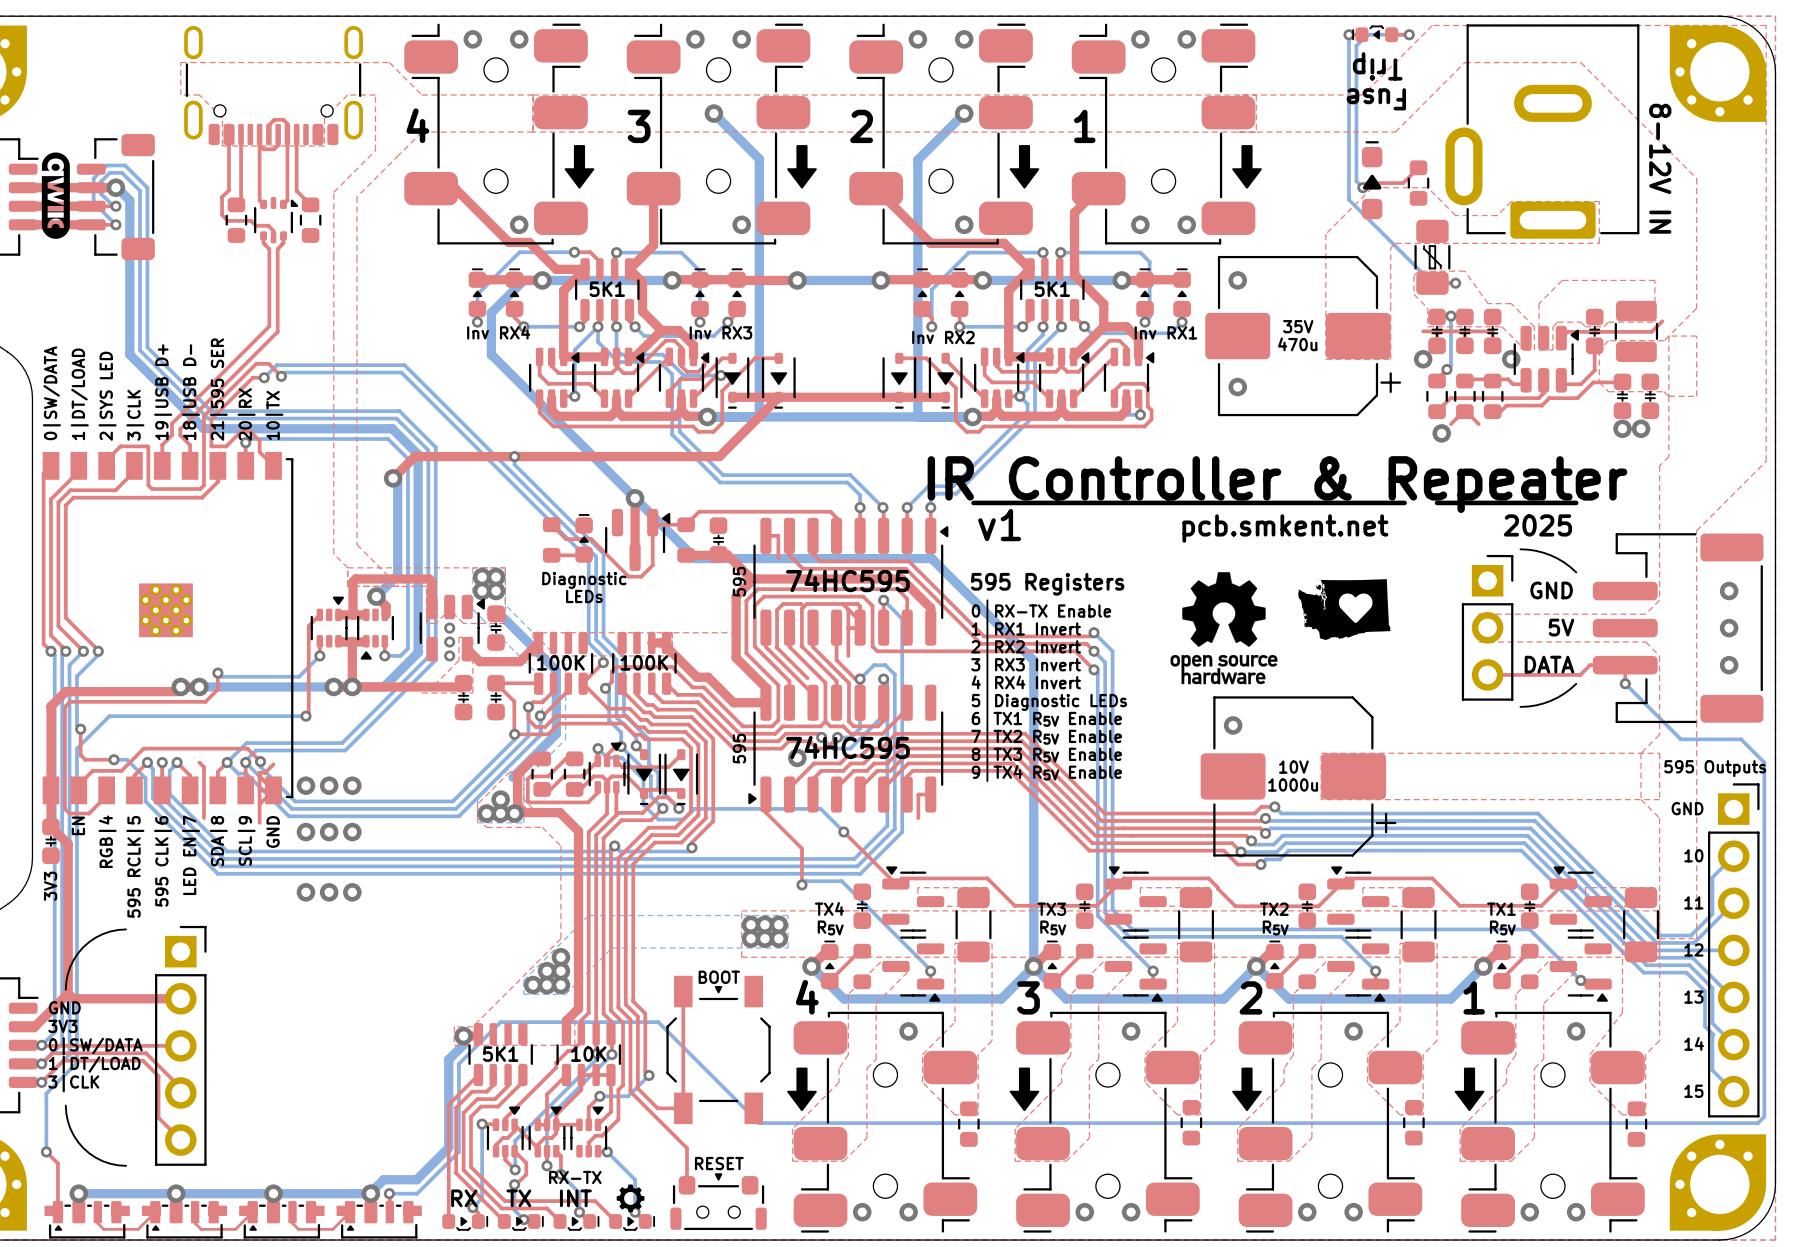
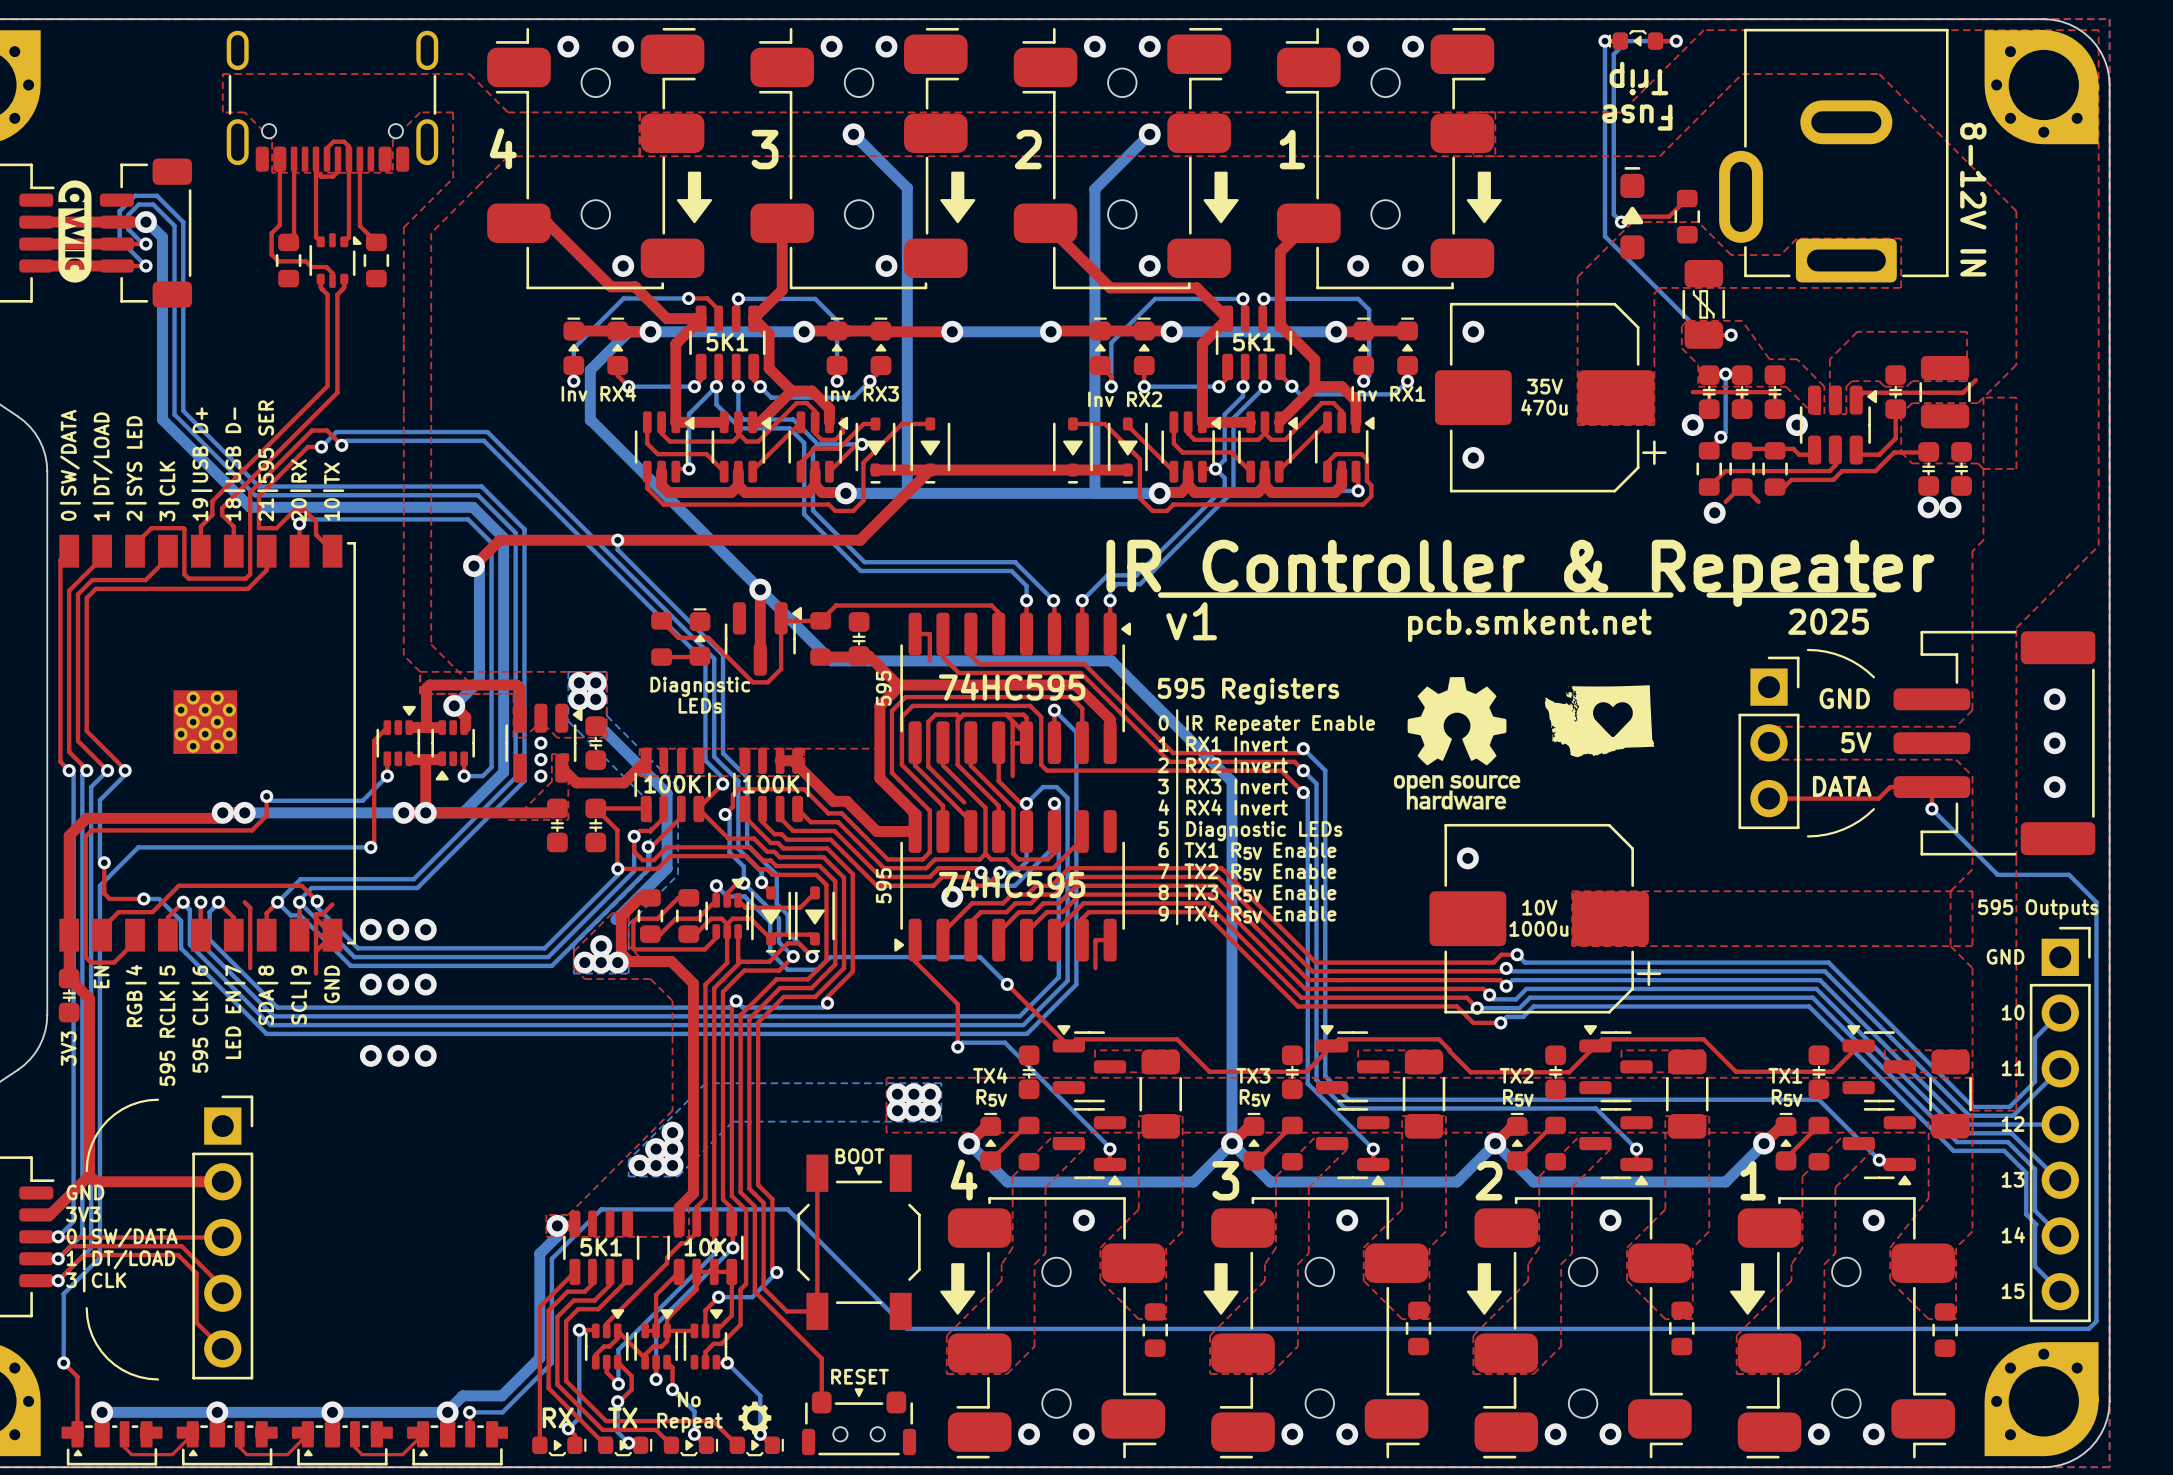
text: RX-TX Enable (1053, 611) -> IR Repeater Enable (1280, 725)
text: RX-TX (575, 1177) -> No (689, 1399)
text: INT (575, 1198) -> Repeat (689, 1422)

